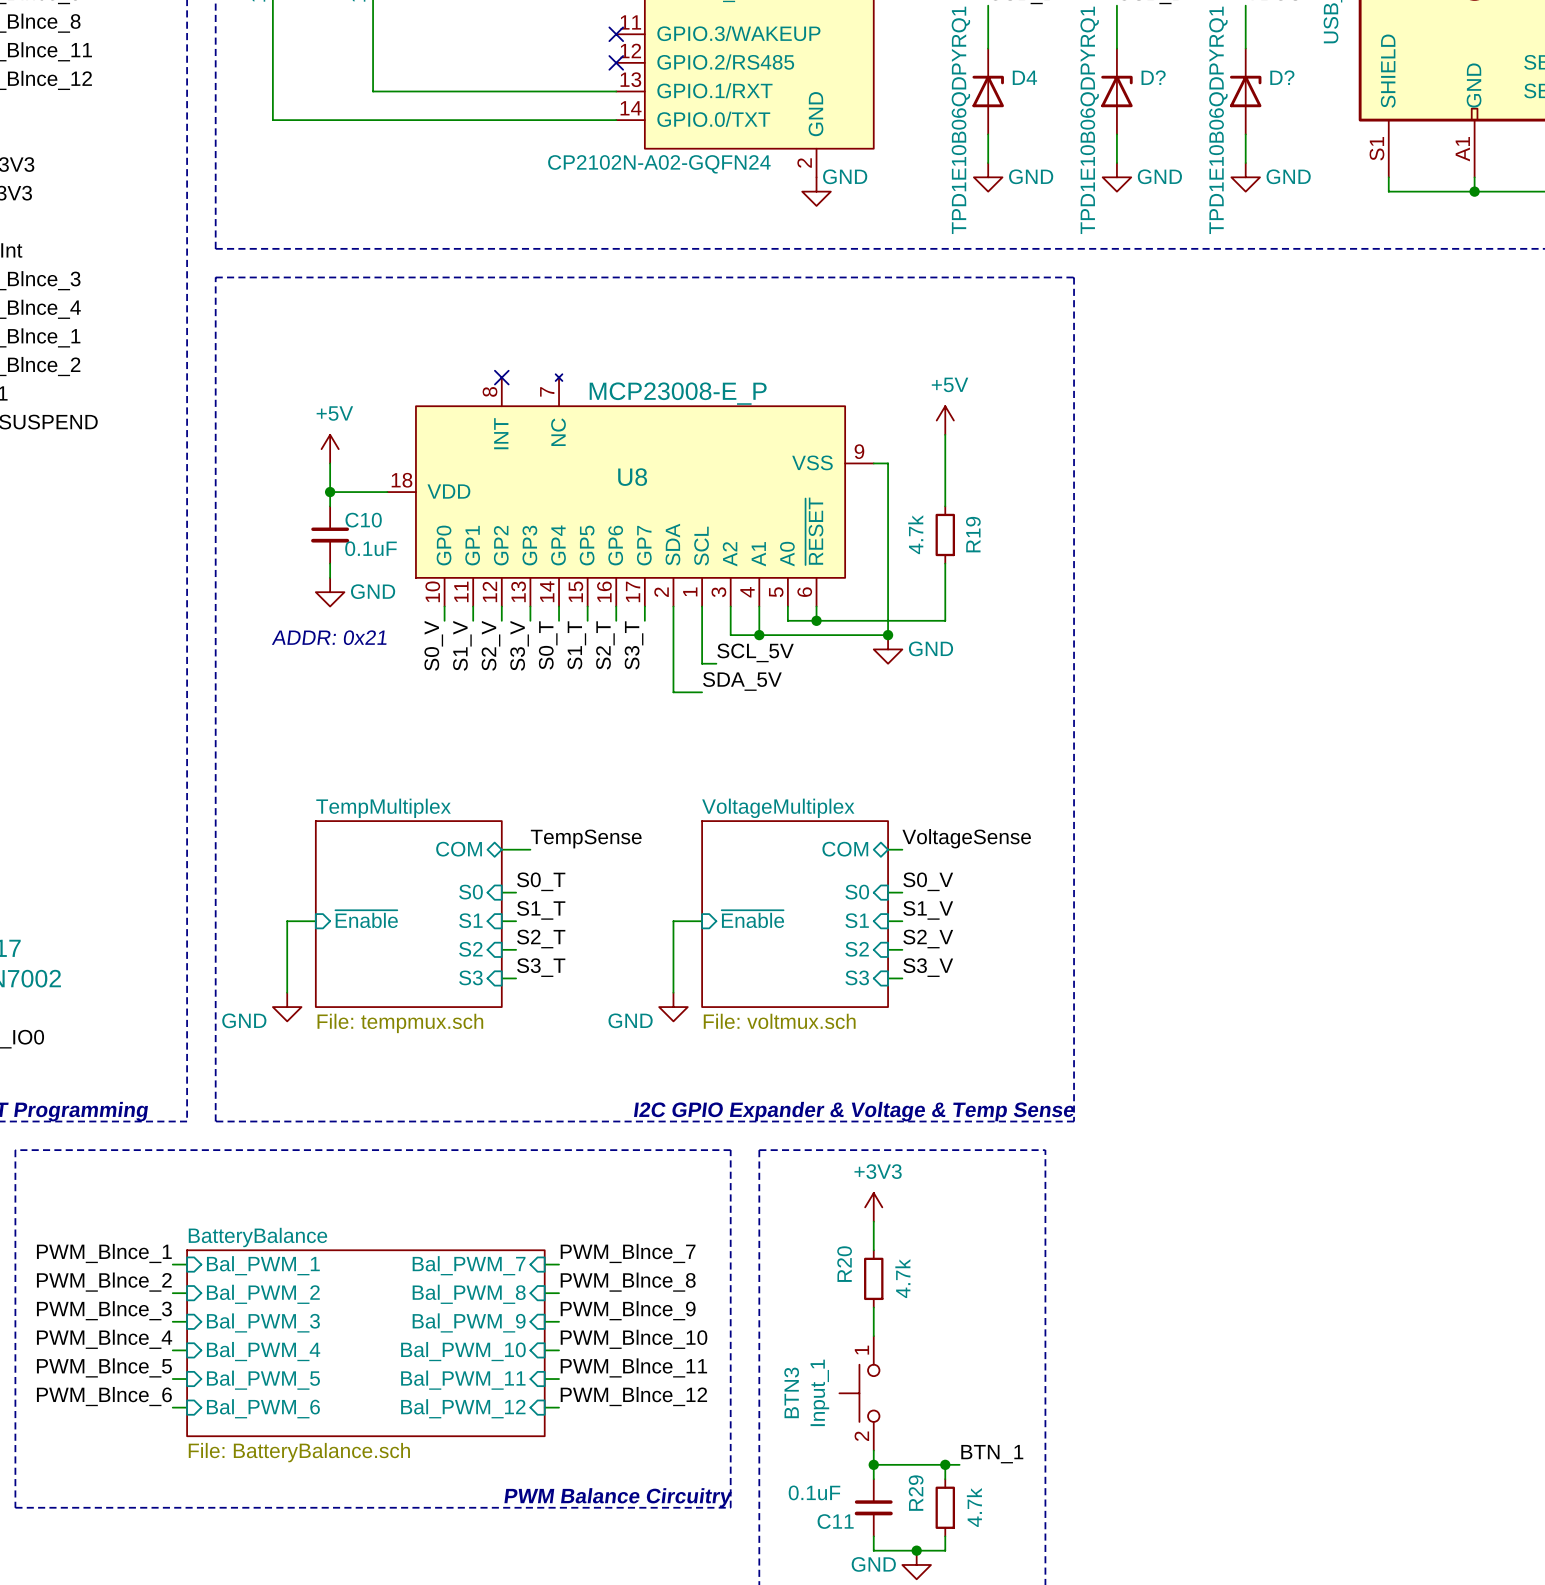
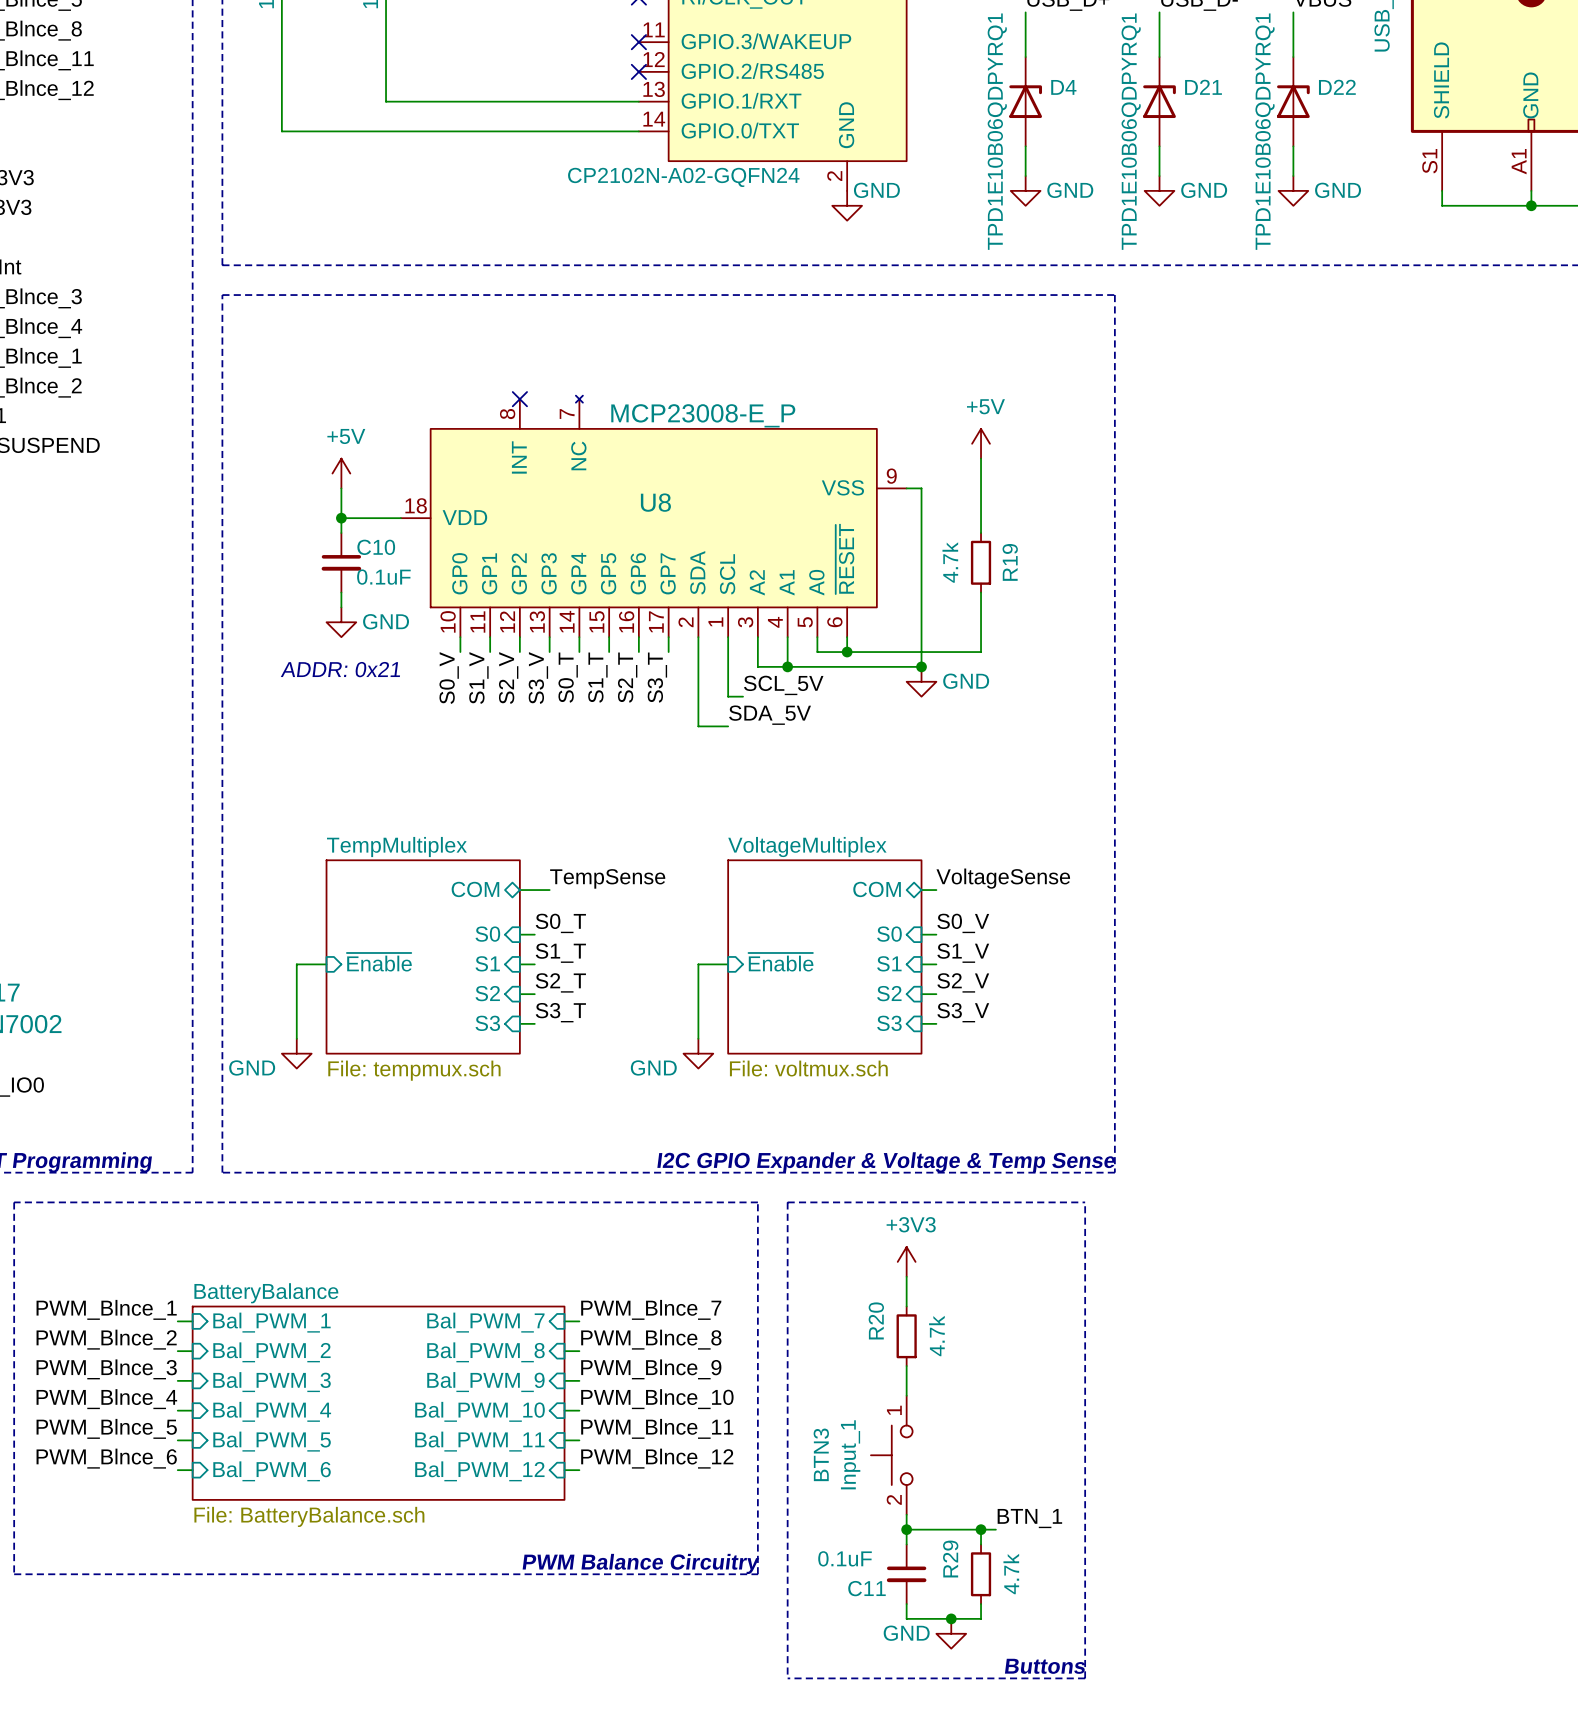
D? name: D? (1153, 77) -> D21 (1203, 87)
D? name: D? (1282, 77) -> D22 (1337, 87)

